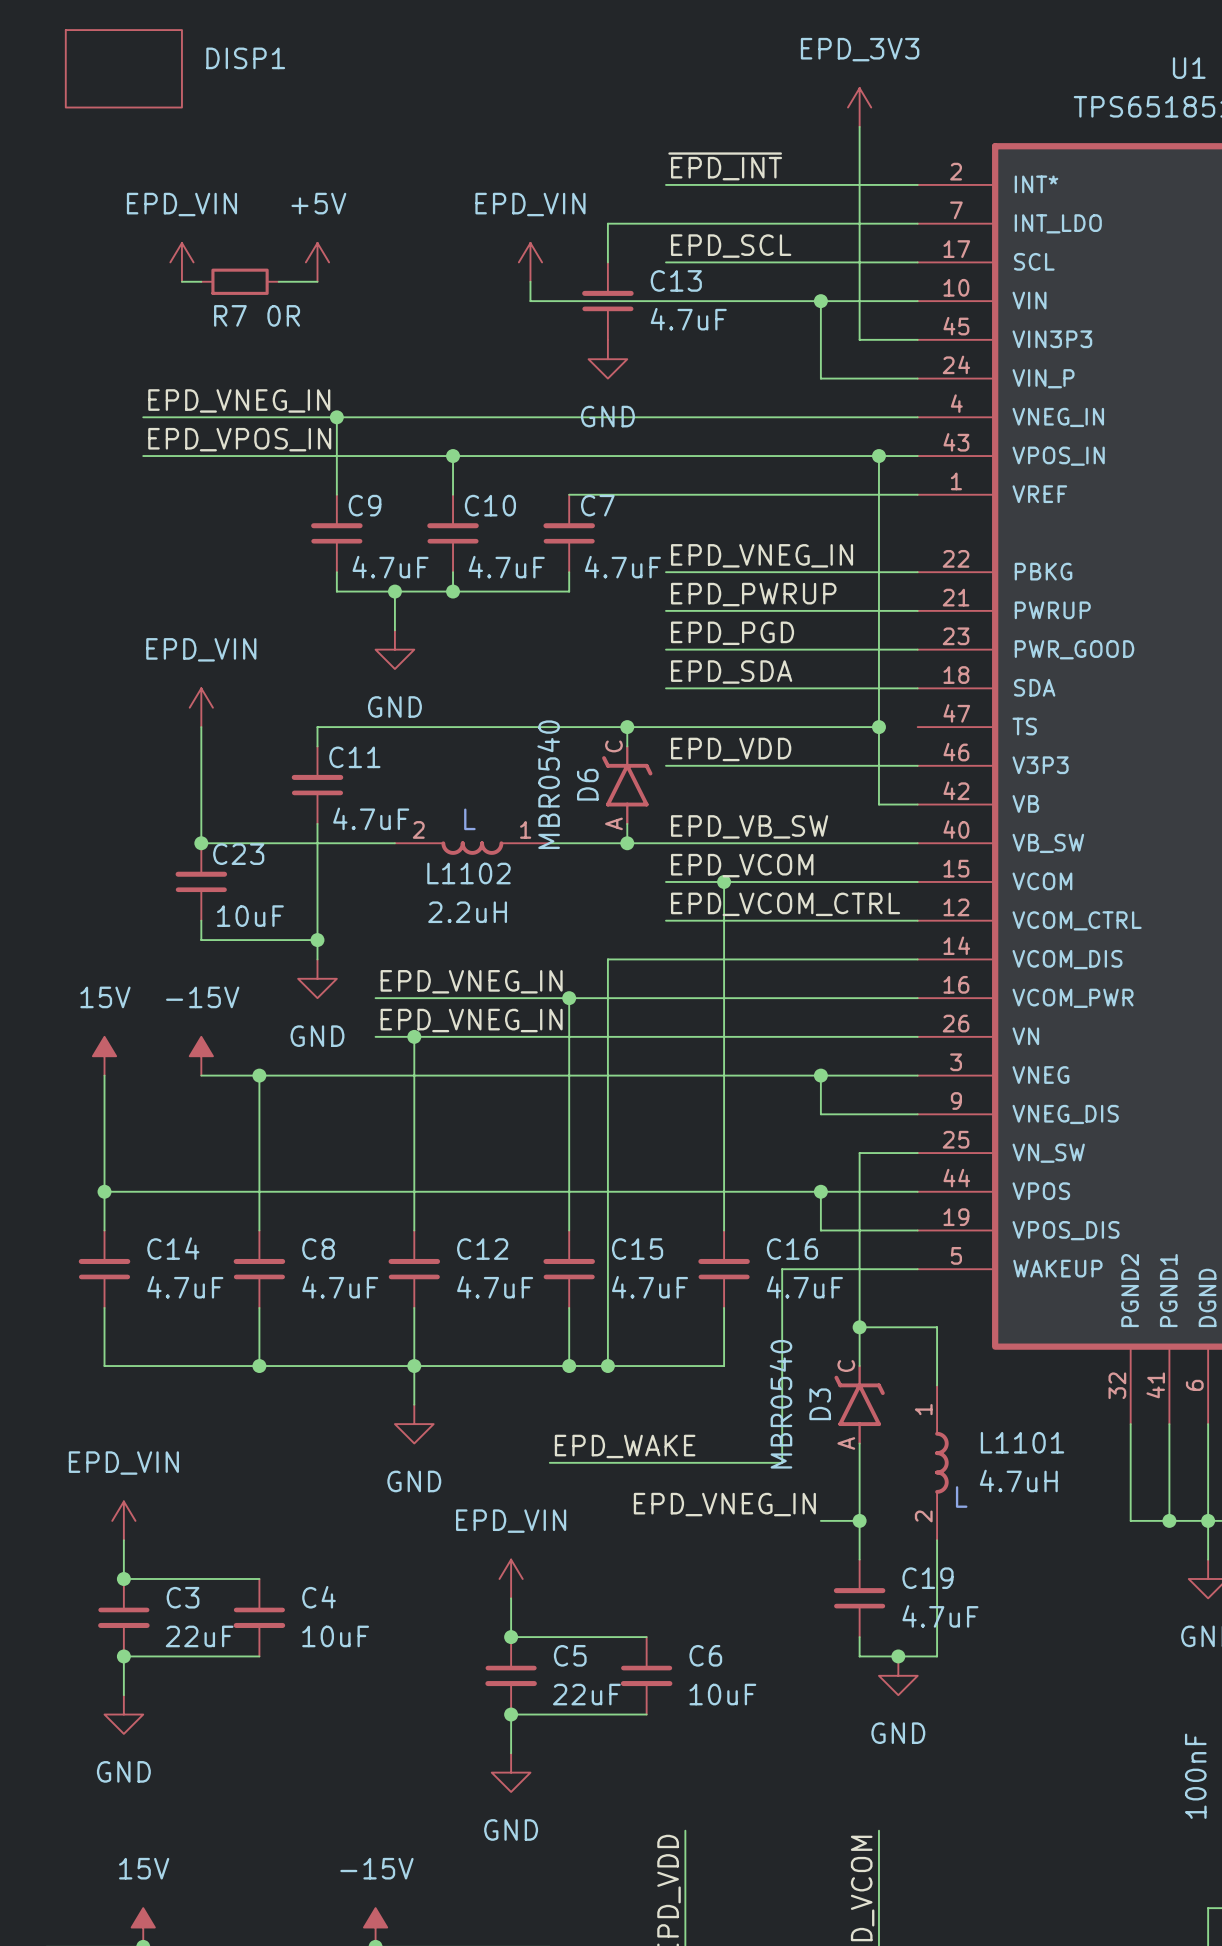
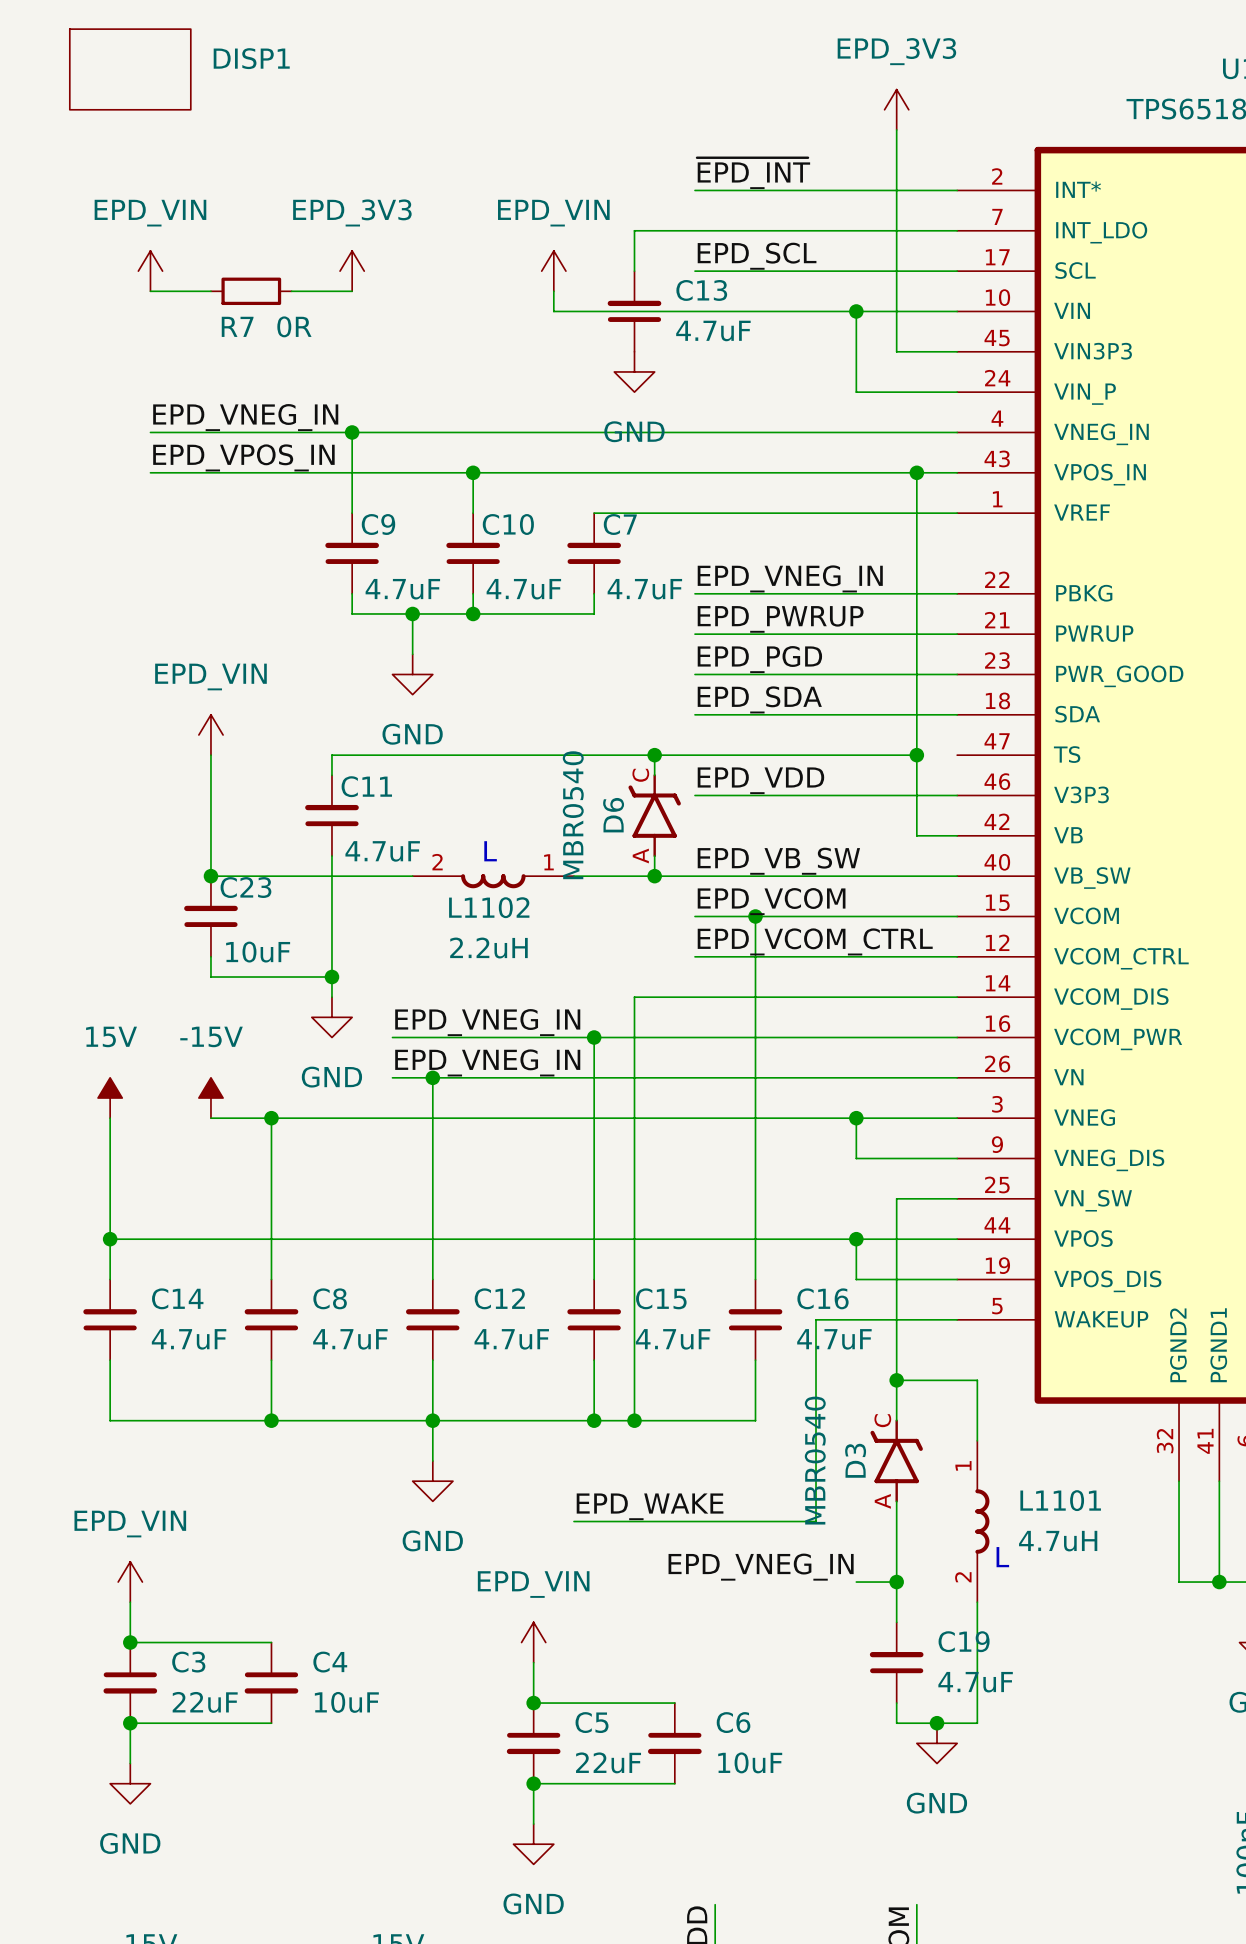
power symbol position: EPD_VIN (181, 262) -> EPD_VIN (150, 271)
power symbol: +5V (317, 262) -> none
power symbol: none -> EPD_3V3 (352, 271)
wire: none -> (150, 291) (190, 291)
wire: none -> (331, 291) (352, 291)

